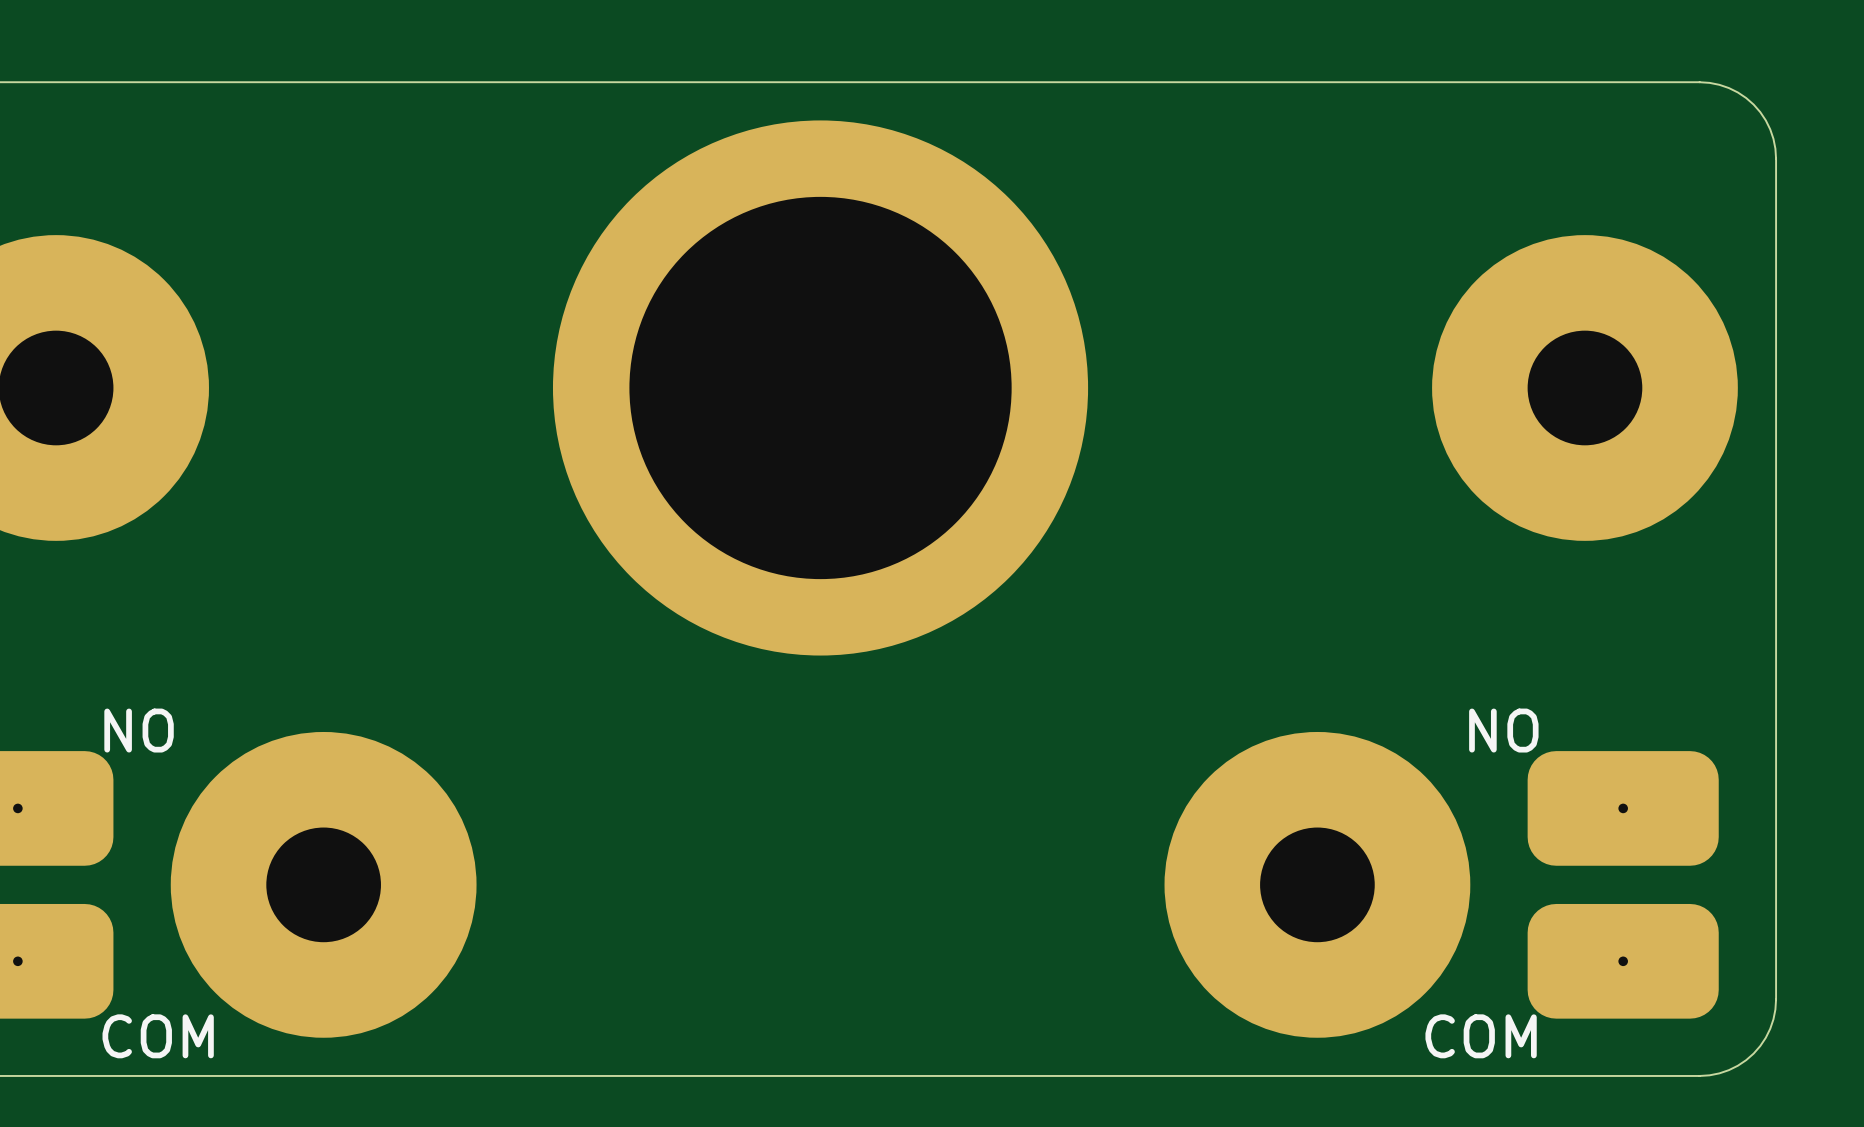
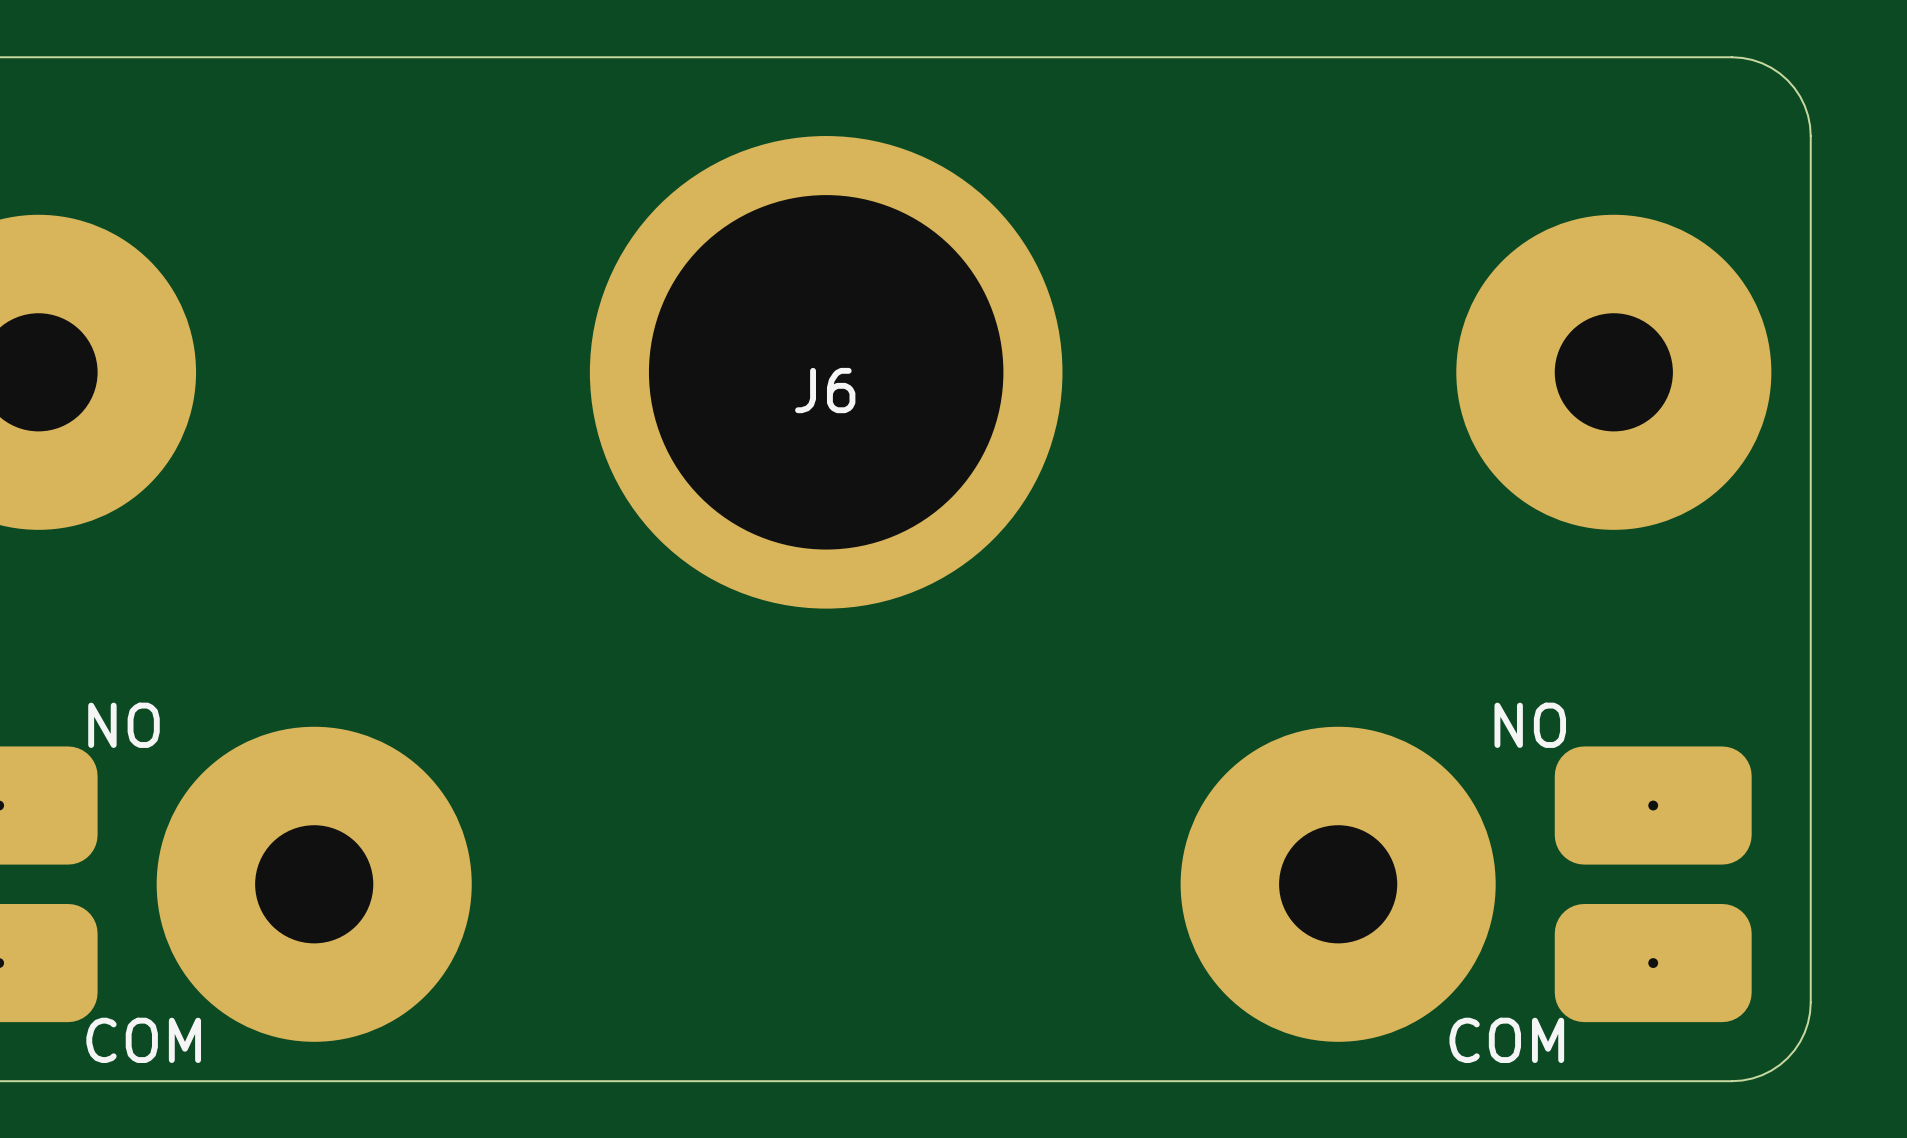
part: (820, 387) -> none
J6: none -> (826, 372)

